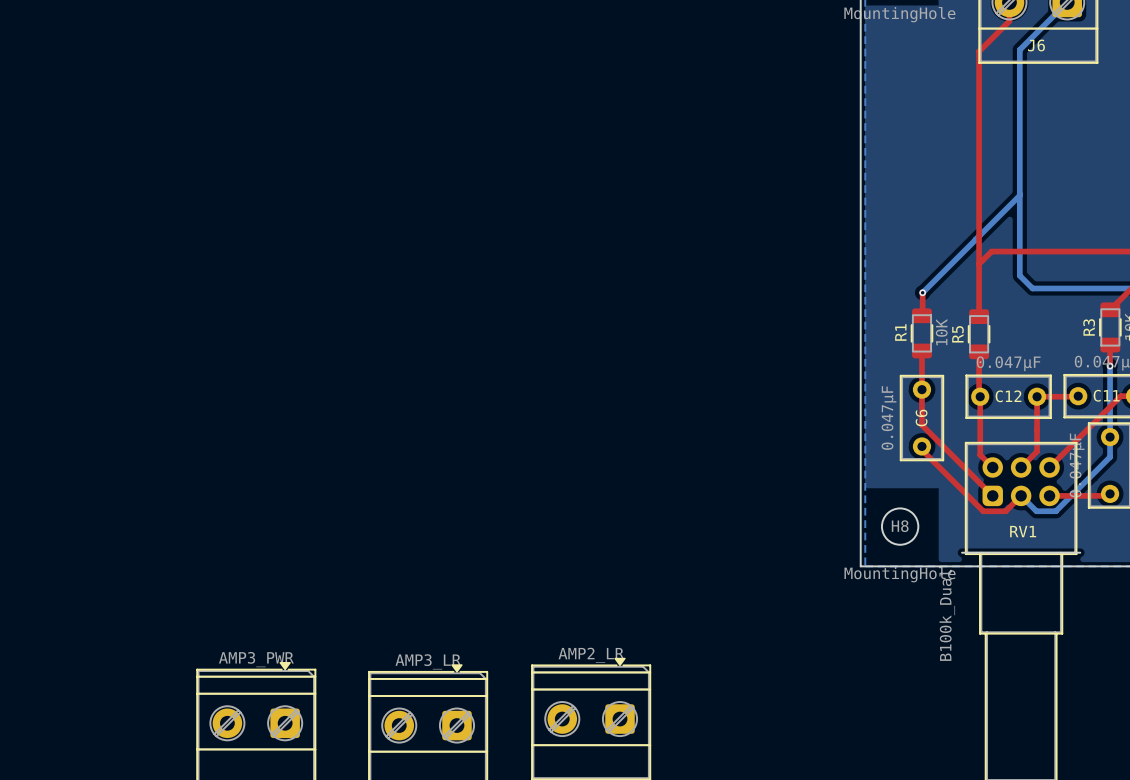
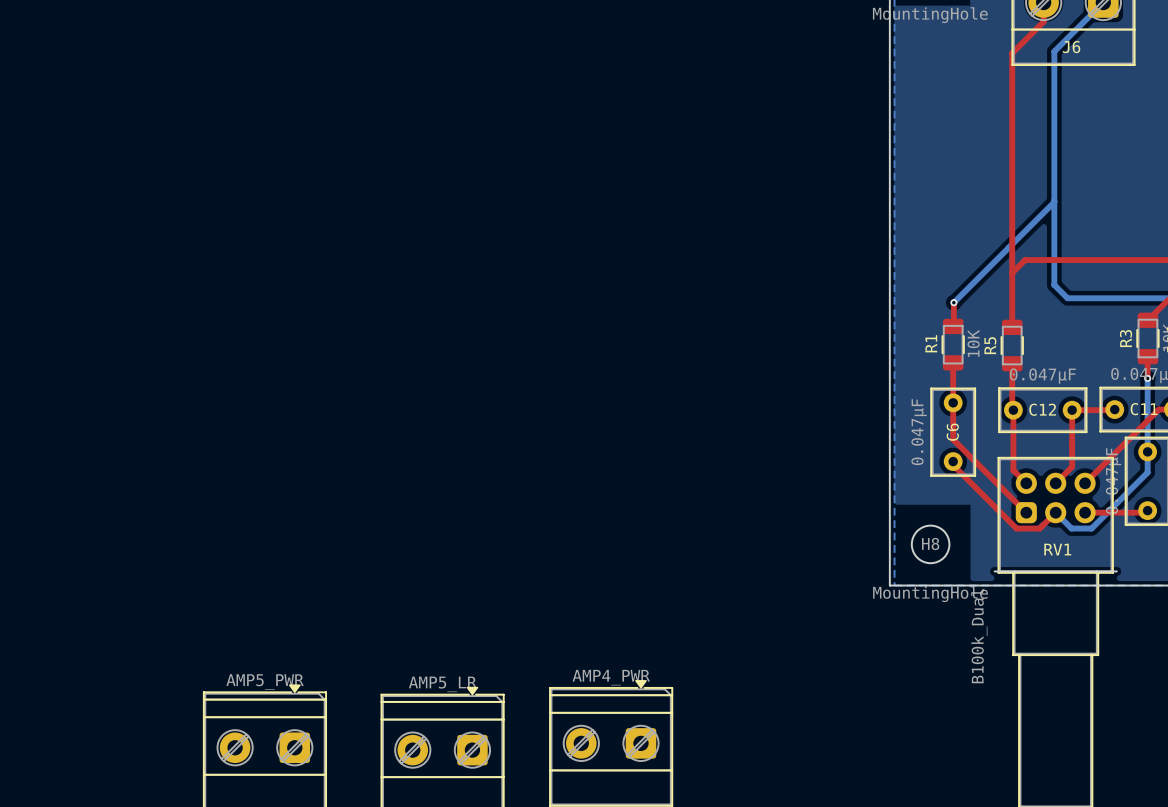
part value: AMP2_LR (591, 655) -> AMP4_PWR (611, 677)
part value: AMP3_PWR (256, 659) -> AMP5_PWR (265, 682)
part value: AMP3_LR (428, 661) -> AMP5_LR (442, 684)

